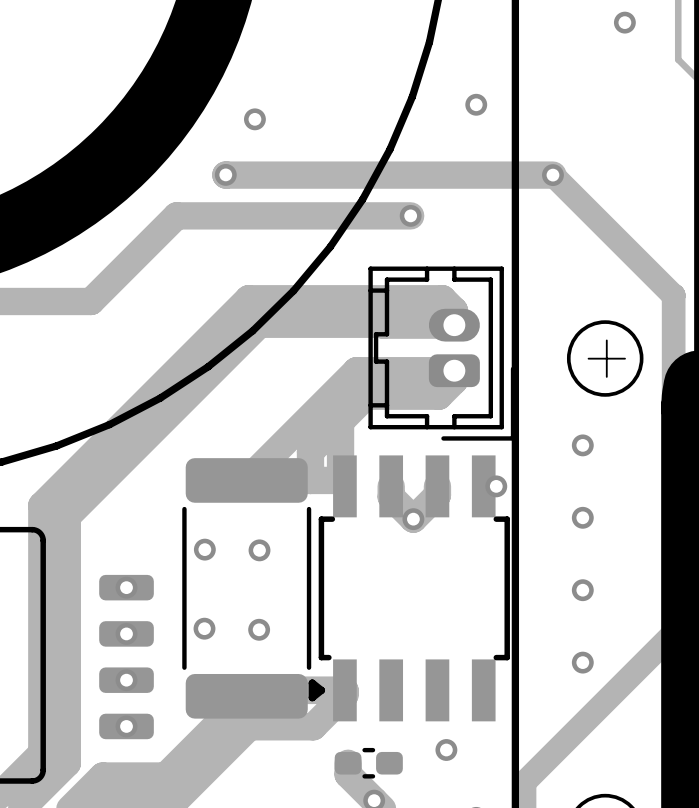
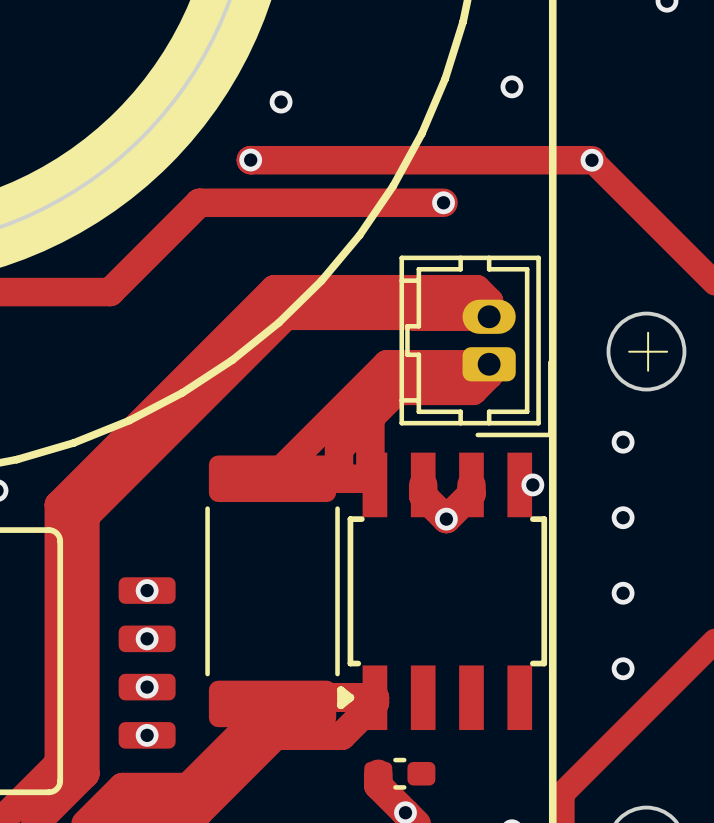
via: (204, 549) -> none
via: (259, 550) -> none
via: (204, 628) -> none
via: (259, 629) -> none
via: (446, 749) -> none

